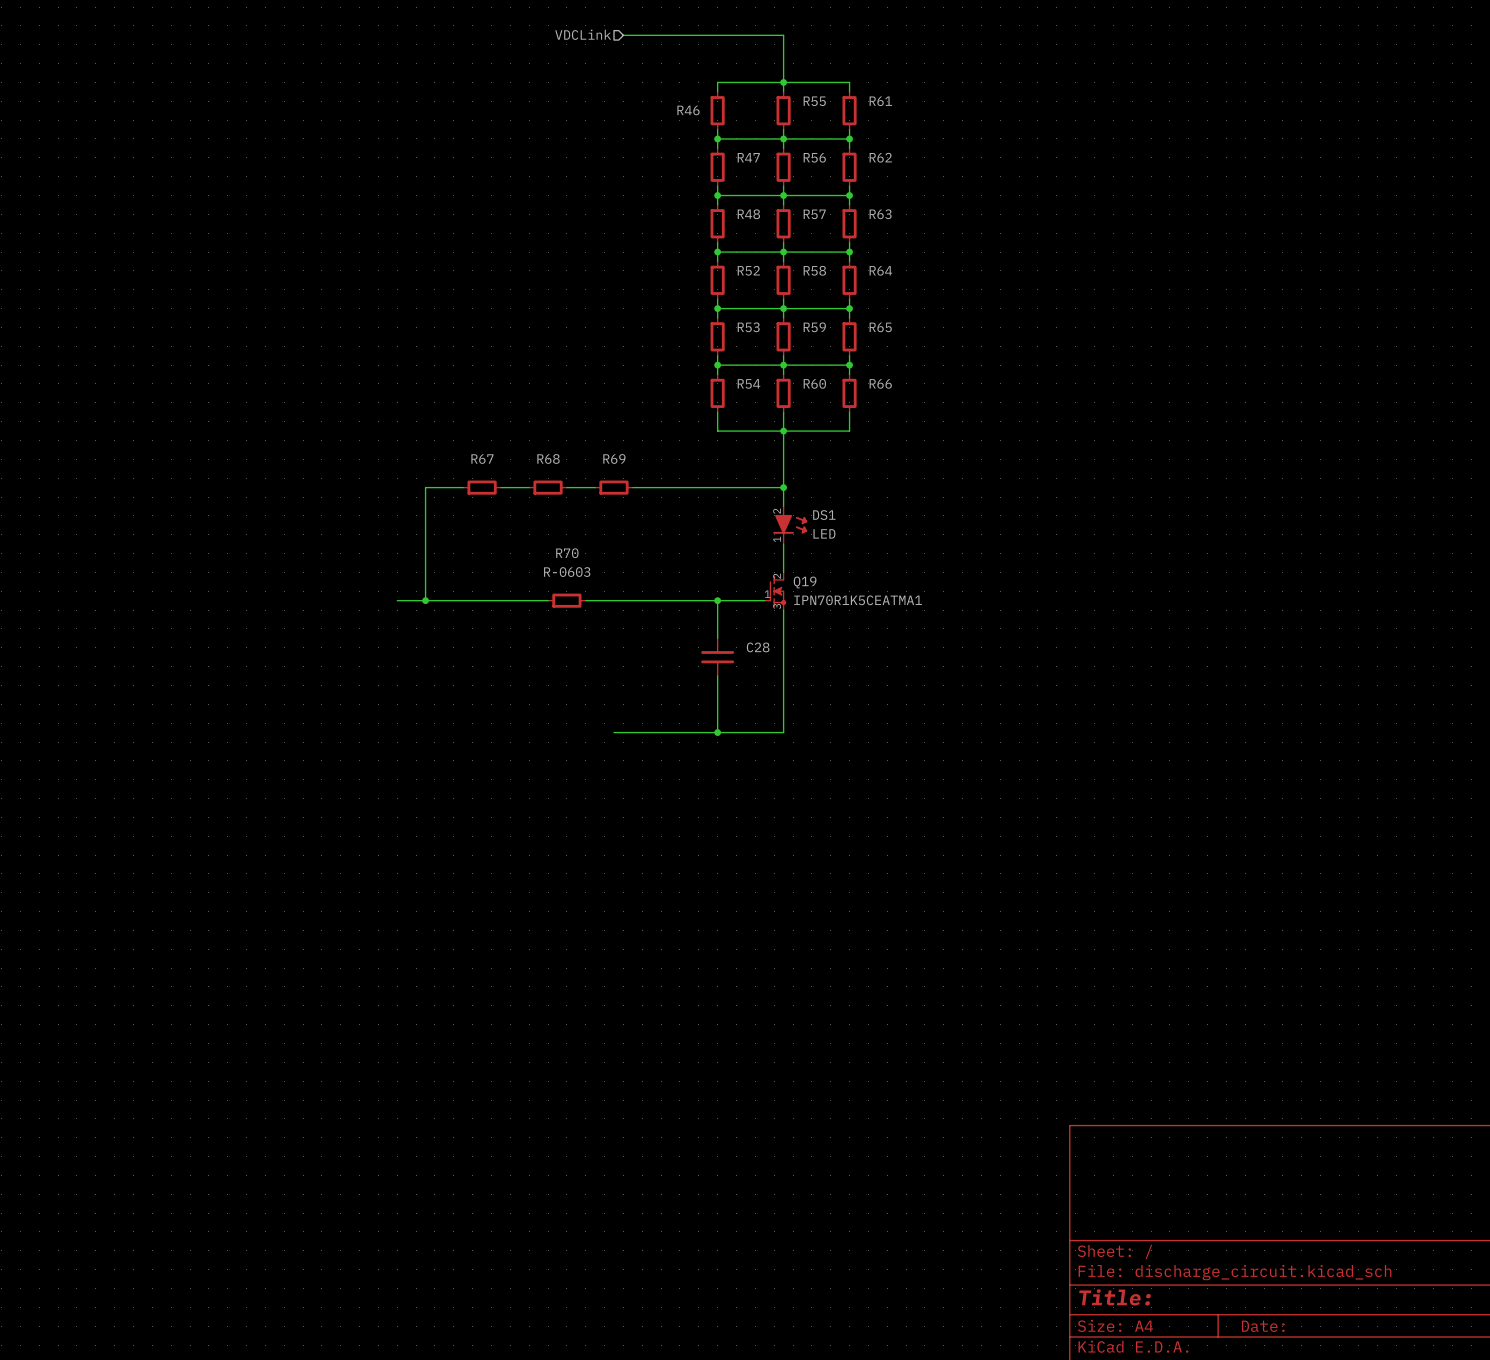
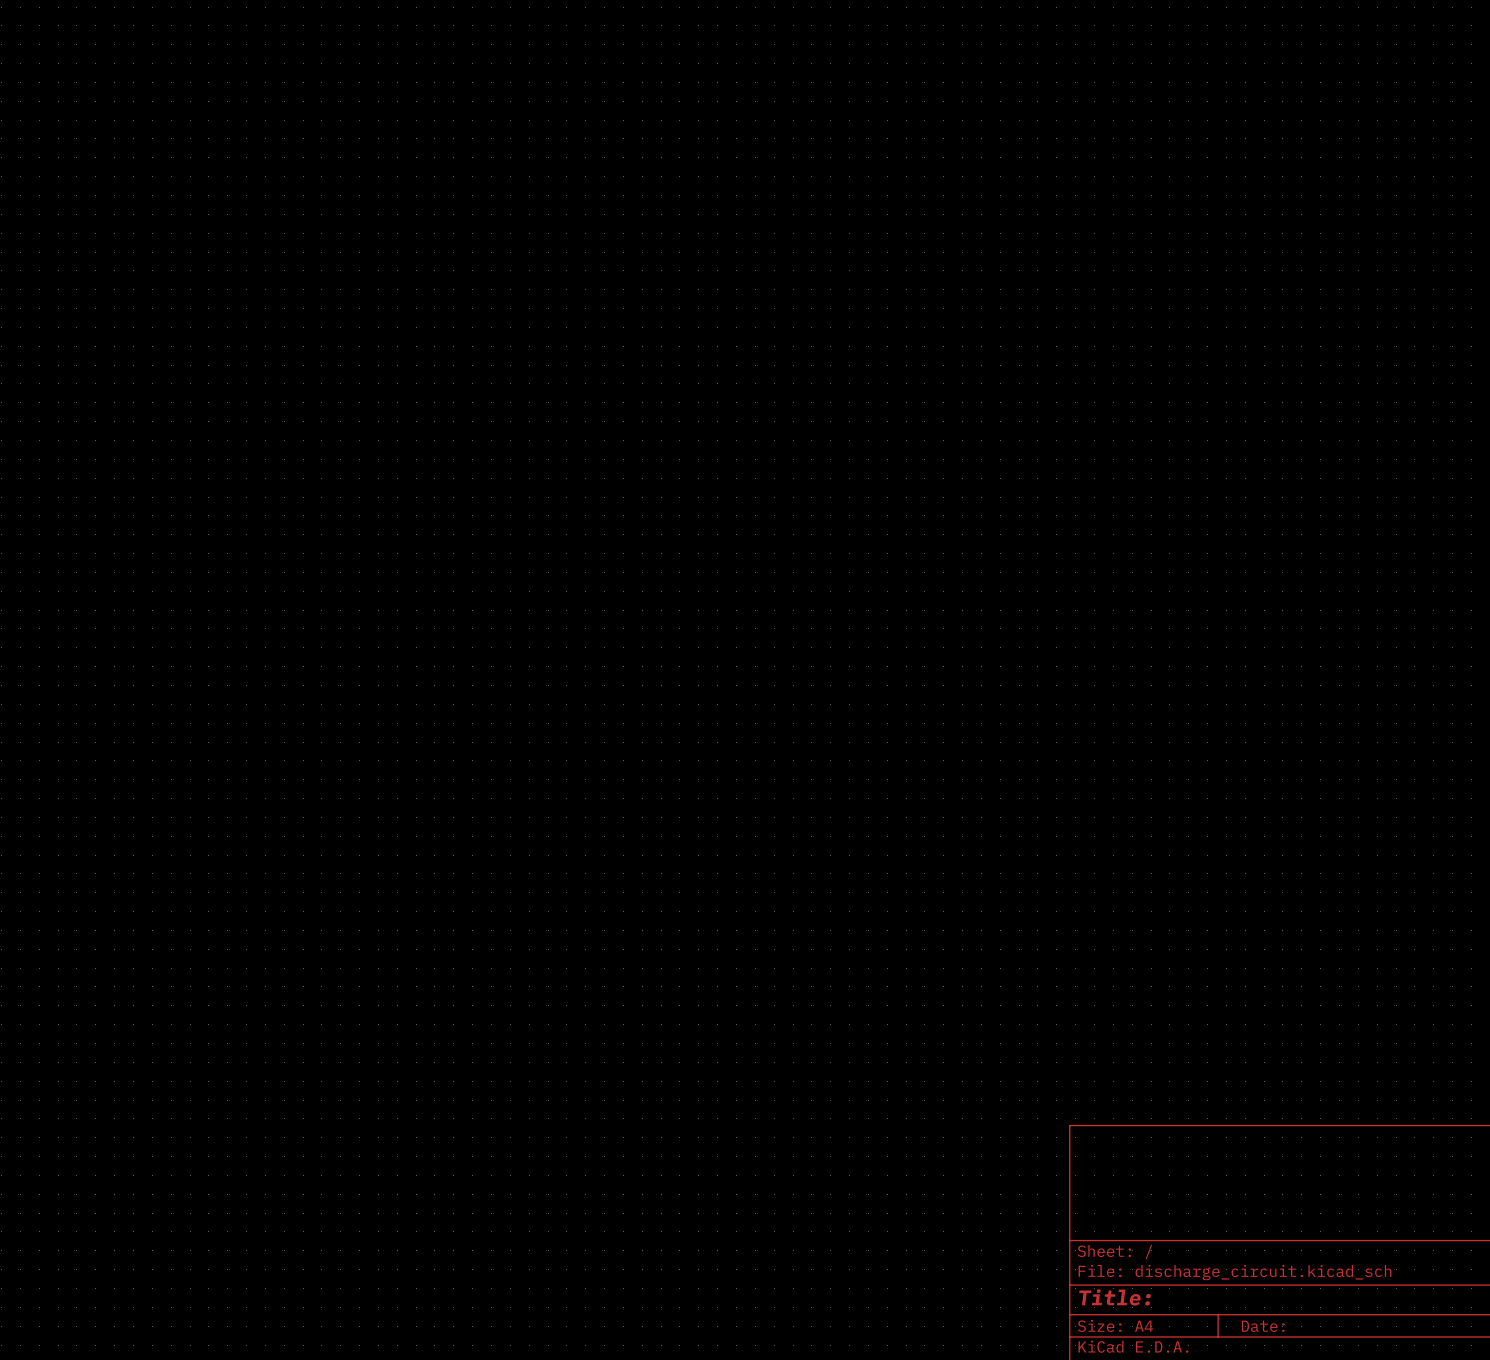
hierarchical label: VDCLink (583, 34) -> none
wire: (623, 35) (783, 35) (783, 91) -> none
junction: (783, 82) -> none
wire: (717, 91) (717, 82) (849, 82) (849, 91) -> none
R46: (717, 110) -> none
R55: (783, 110) -> none
R61: (849, 110) -> none
wire: (717, 129) (717, 148) -> none
wire: (783, 129) (783, 148) -> none
wire: (849, 129) (849, 148) -> none
wire: (717, 138) (849, 138) -> none
junction: (717, 138) -> none
junction: (783, 138) -> none
junction: (849, 138) -> none
R47: (717, 167) -> none
R56: (783, 167) -> none
R62: (849, 167) -> none
wire: (717, 186) (717, 204) -> none
wire: (783, 186) (783, 204) -> none
wire: (849, 186) (849, 204) -> none
wire: (717, 195) (849, 195) -> none
junction: (717, 195) -> none
junction: (783, 195) -> none
junction: (849, 195) -> none
R48: (717, 223) -> none
R57: (783, 223) -> none
R63: (849, 223) -> none
wire: (717, 242) (717, 261) -> none
wire: (783, 242) (783, 261) -> none
wire: (849, 242) (849, 261) -> none
wire: (717, 252) (849, 252) -> none
junction: (717, 252) -> none
junction: (783, 252) -> none
junction: (849, 252) -> none
R52: (717, 280) -> none
R58: (783, 280) -> none
R64: (849, 280) -> none
wire: (717, 299) (717, 318) -> none
wire: (783, 299) (783, 318) -> none
wire: (849, 299) (849, 318) -> none
wire: (717, 308) (849, 308) -> none
junction: (717, 308) -> none
junction: (783, 308) -> none
junction: (849, 308) -> none
R53: (717, 336) -> none
R59: (783, 336) -> none
R65: (849, 336) -> none
wire: (717, 355) (717, 374) -> none
wire: (783, 355) (783, 374) -> none
wire: (849, 355) (849, 374) -> none
wire: (717, 365) (849, 365) -> none
junction: (717, 365) -> none
junction: (783, 365) -> none
junction: (849, 365) -> none
R54: (717, 393) -> none
R60: (783, 393) -> none
R66: (849, 393) -> none
wire: (717, 412) (717, 431) (849, 431) (849, 412) -> none
wire: (783, 412) (783, 506) -> none
junction: (783, 431) -> none
wire: (463, 487) (425, 487) (425, 600) -> none
R67: (482, 487) -> none
wire: (500, 487) (529, 487) -> none
R68: (548, 487) -> none
wire: (566, 487) (595, 487) -> none
R69: (614, 487) -> none
wire: (632, 487) (783, 487) -> none
junction: (783, 487) -> none
DS1: LED (790, 525) -> none
wire: (783, 544) (783, 572) -> none
Q19: IPN70R1K5CEATMA1 (775, 591) -> none
wire: (397, 600) (548, 600) -> none
junction: (425, 600) -> none
R70: R-0603 (566, 600) -> none
wire: (585, 600) (764, 600) -> none
wire: (717, 600) (717, 638) -> none
junction: (717, 600) -> none
wire: (783, 610) (783, 732) (614, 732) -> none
C28: (717, 657) -> none
wire: (717, 676) (717, 732) -> none
junction: (717, 732) -> none

